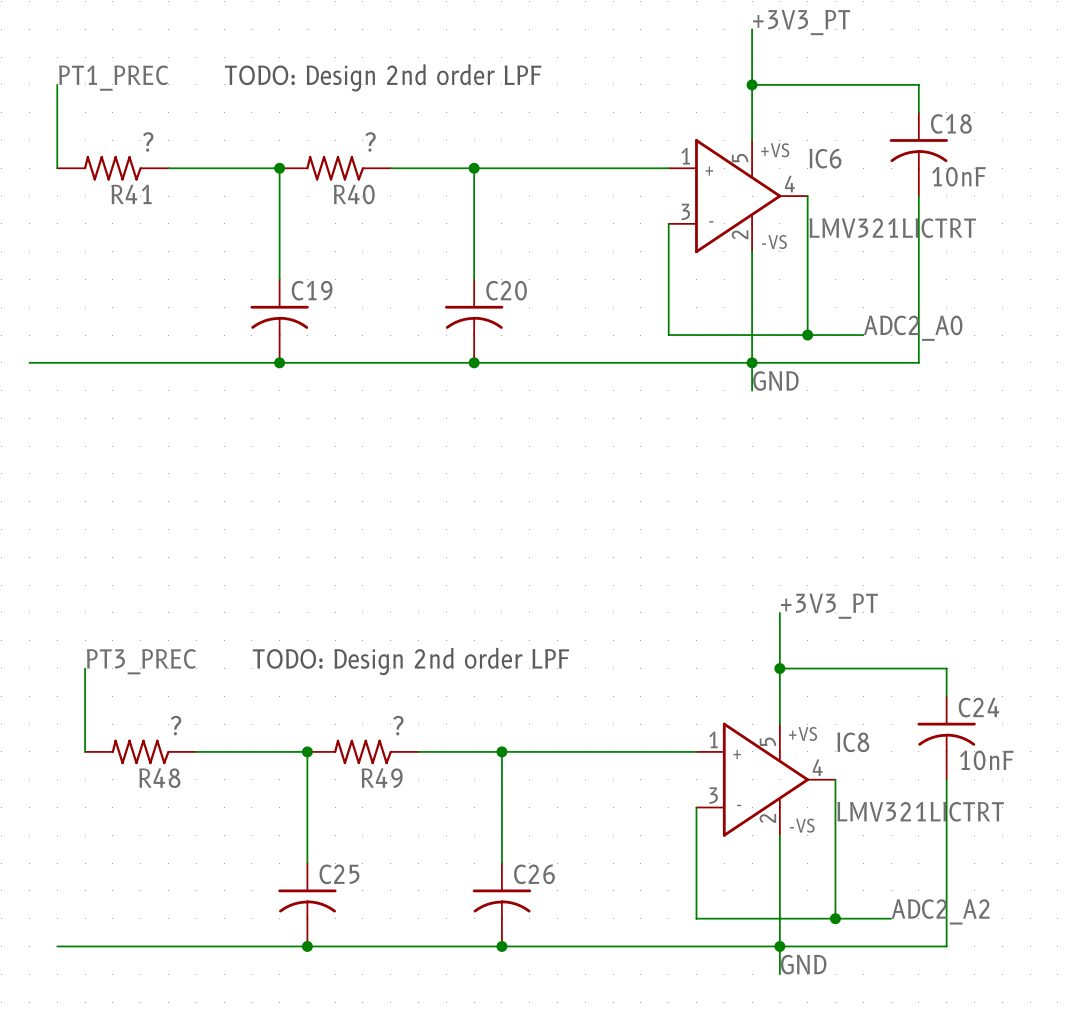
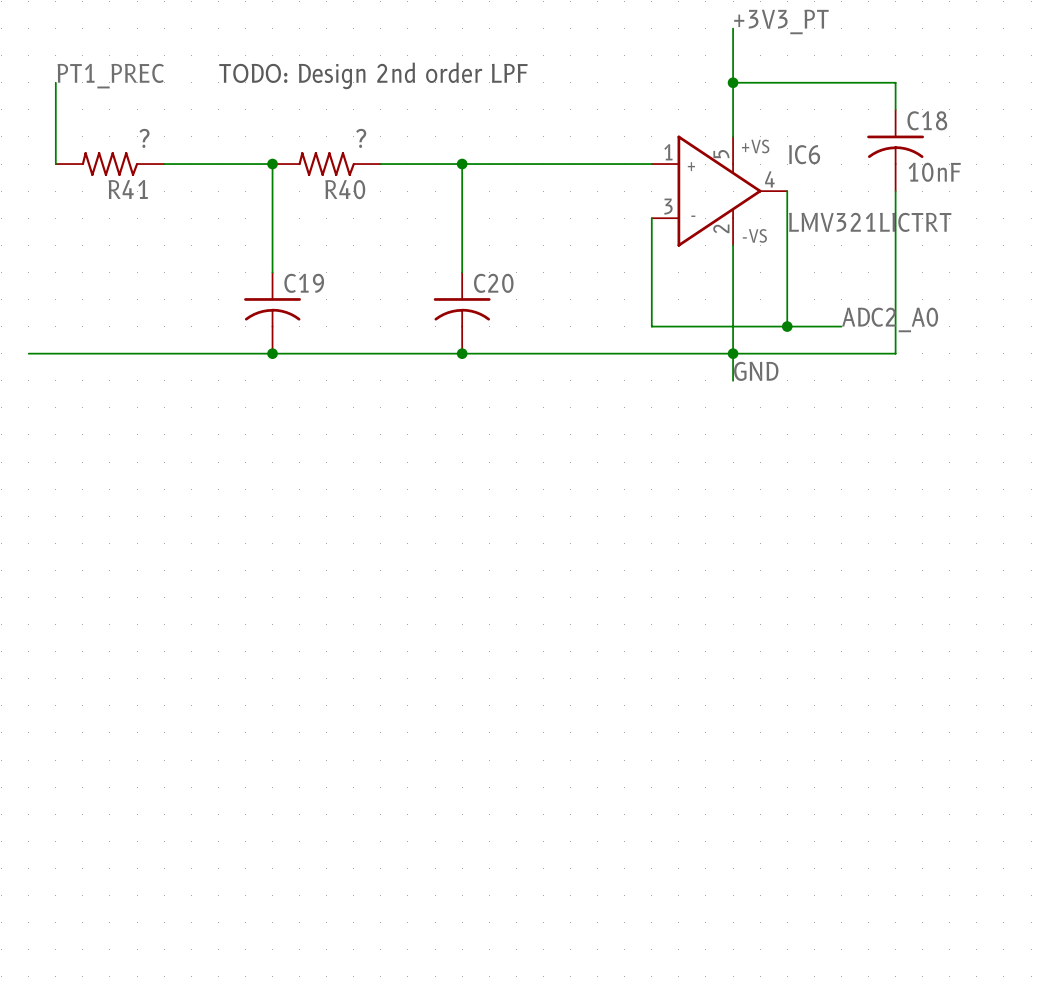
label: +3V3_PT (829, 606) -> none
wire: (779, 612) (779, 724) -> none
label: PT3_PREC (141, 661) -> none
text: TODO: Design 2nd order LPF (410, 661) -> none
wire: (85, 668) (85, 751) -> none
wire: (779, 668) (946, 668) (946, 696) -> none
junction: (779, 668) -> none
C24: 10nF (946, 738) -> none
R48: ? (140, 751) -> none
wire: (196, 751) (307, 751) (307, 863) -> none
junction: (307, 751) -> none
R49: ? (362, 751) -> none
wire: (418, 751) (696, 751) -> none
wire: (501, 751) (501, 863) -> none
junction: (501, 751) -> none
IC8: LMV321LICTRT (765, 779) -> none
wire: (835, 779) (835, 918) -> none
wire: (946, 779) (946, 946) (57, 946) -> none
wire: (696, 807) (696, 918) (891, 918) -> none
wire: (779, 835) (779, 974) -> none
C25: (307, 904) -> none
C26: (501, 904) -> none
label: ADC2_A2 (940, 911) -> none
junction: (835, 918) -> none
junction: (307, 946) -> none
junction: (501, 946) -> none
junction: (779, 946) -> none
label: GND (803, 964) -> none

